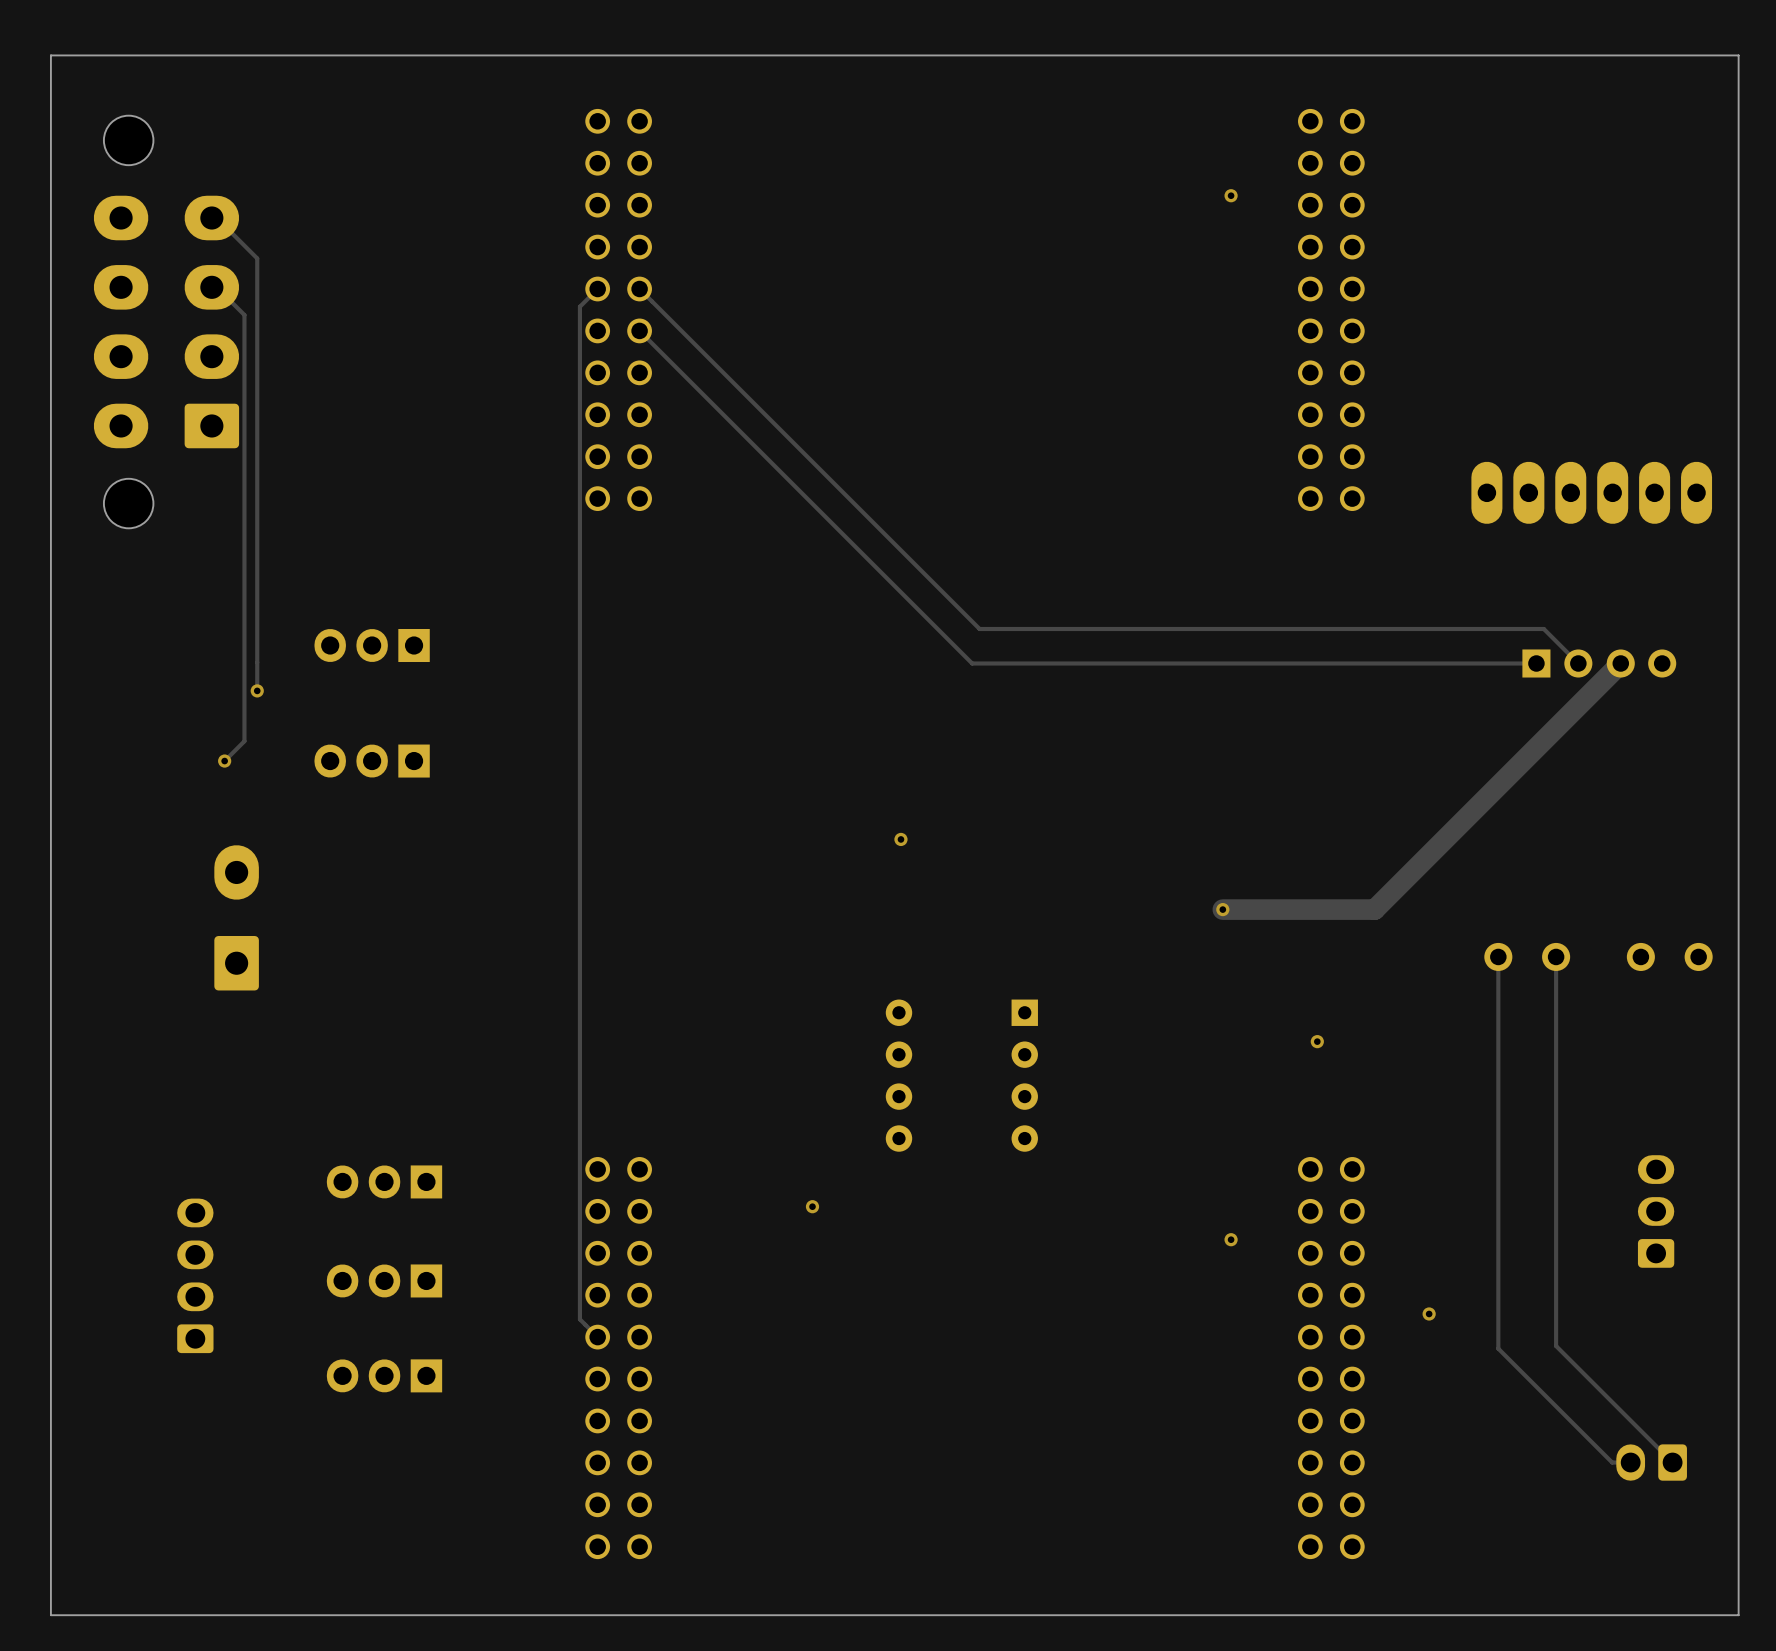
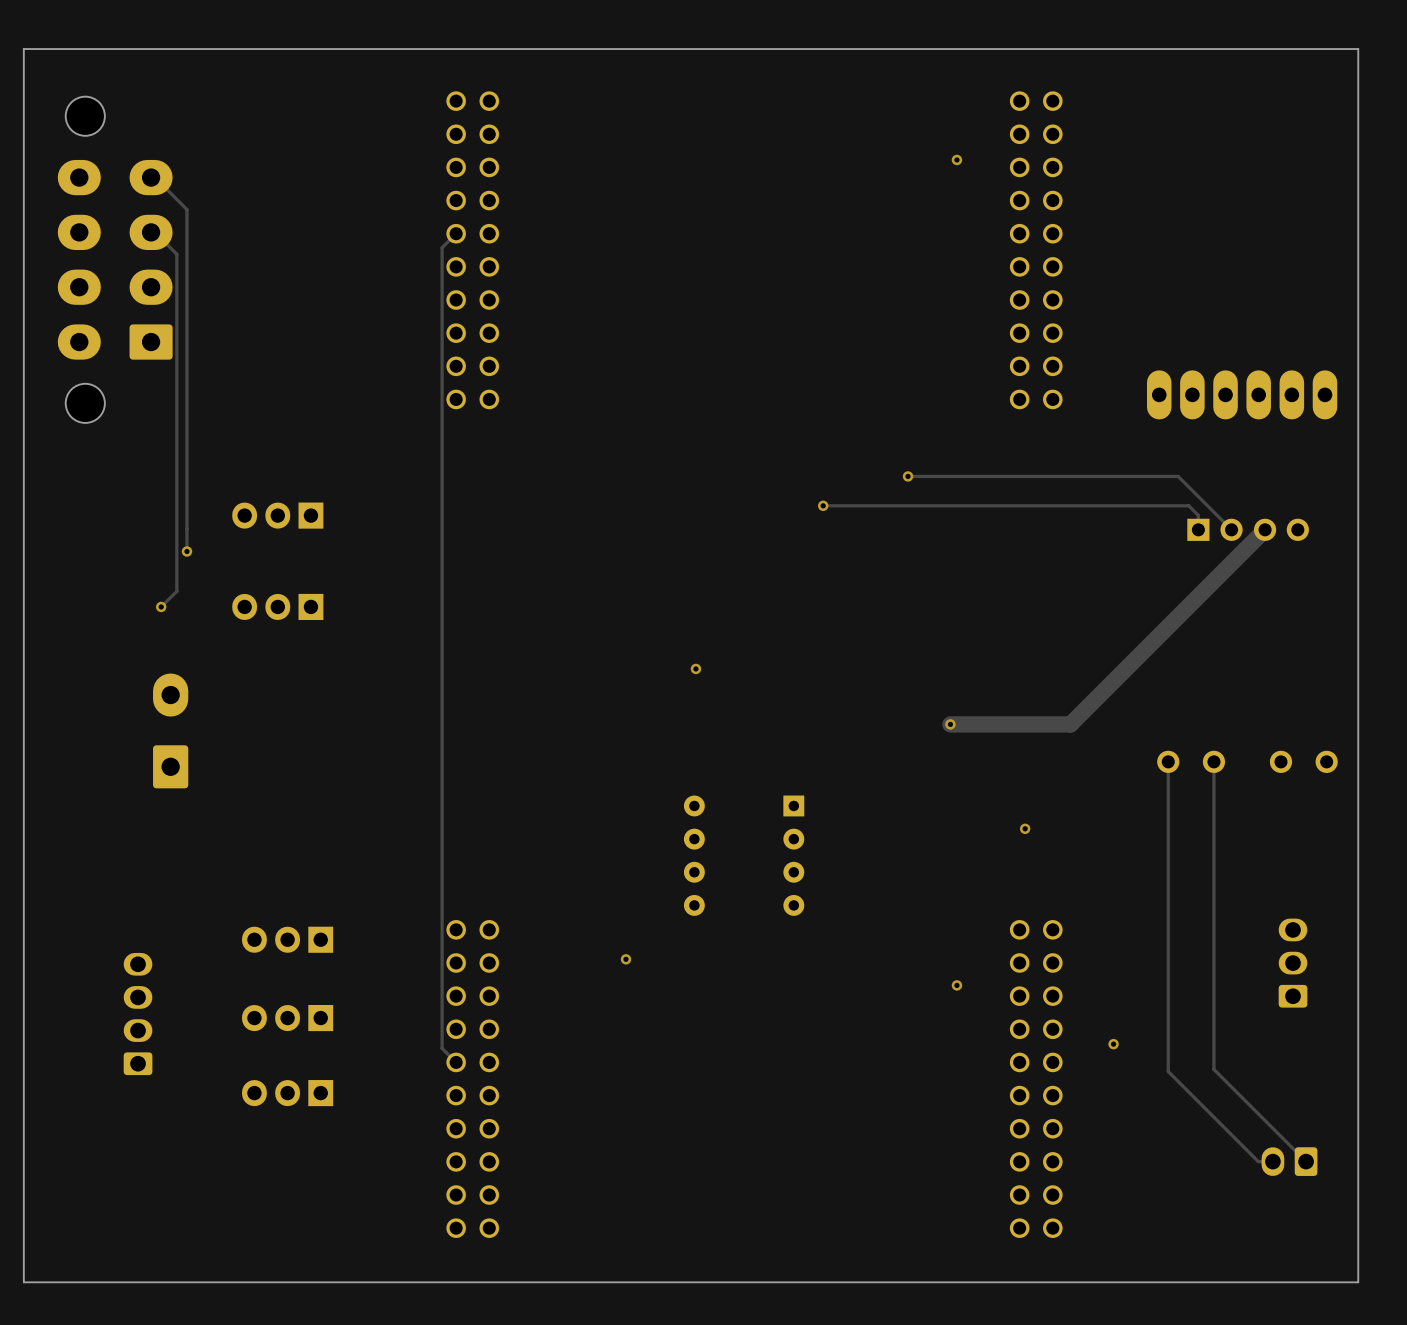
track: (639, 289) (979, 629) (1543, 629) -> (908, 476) (1178, 476) (1204, 502)
track: (639, 330) (972, 663) (1536, 663) -> (823, 505) (1188, 505) (1198, 515) (1198, 529)
via: none -> (908, 476)
via: none -> (823, 505)

